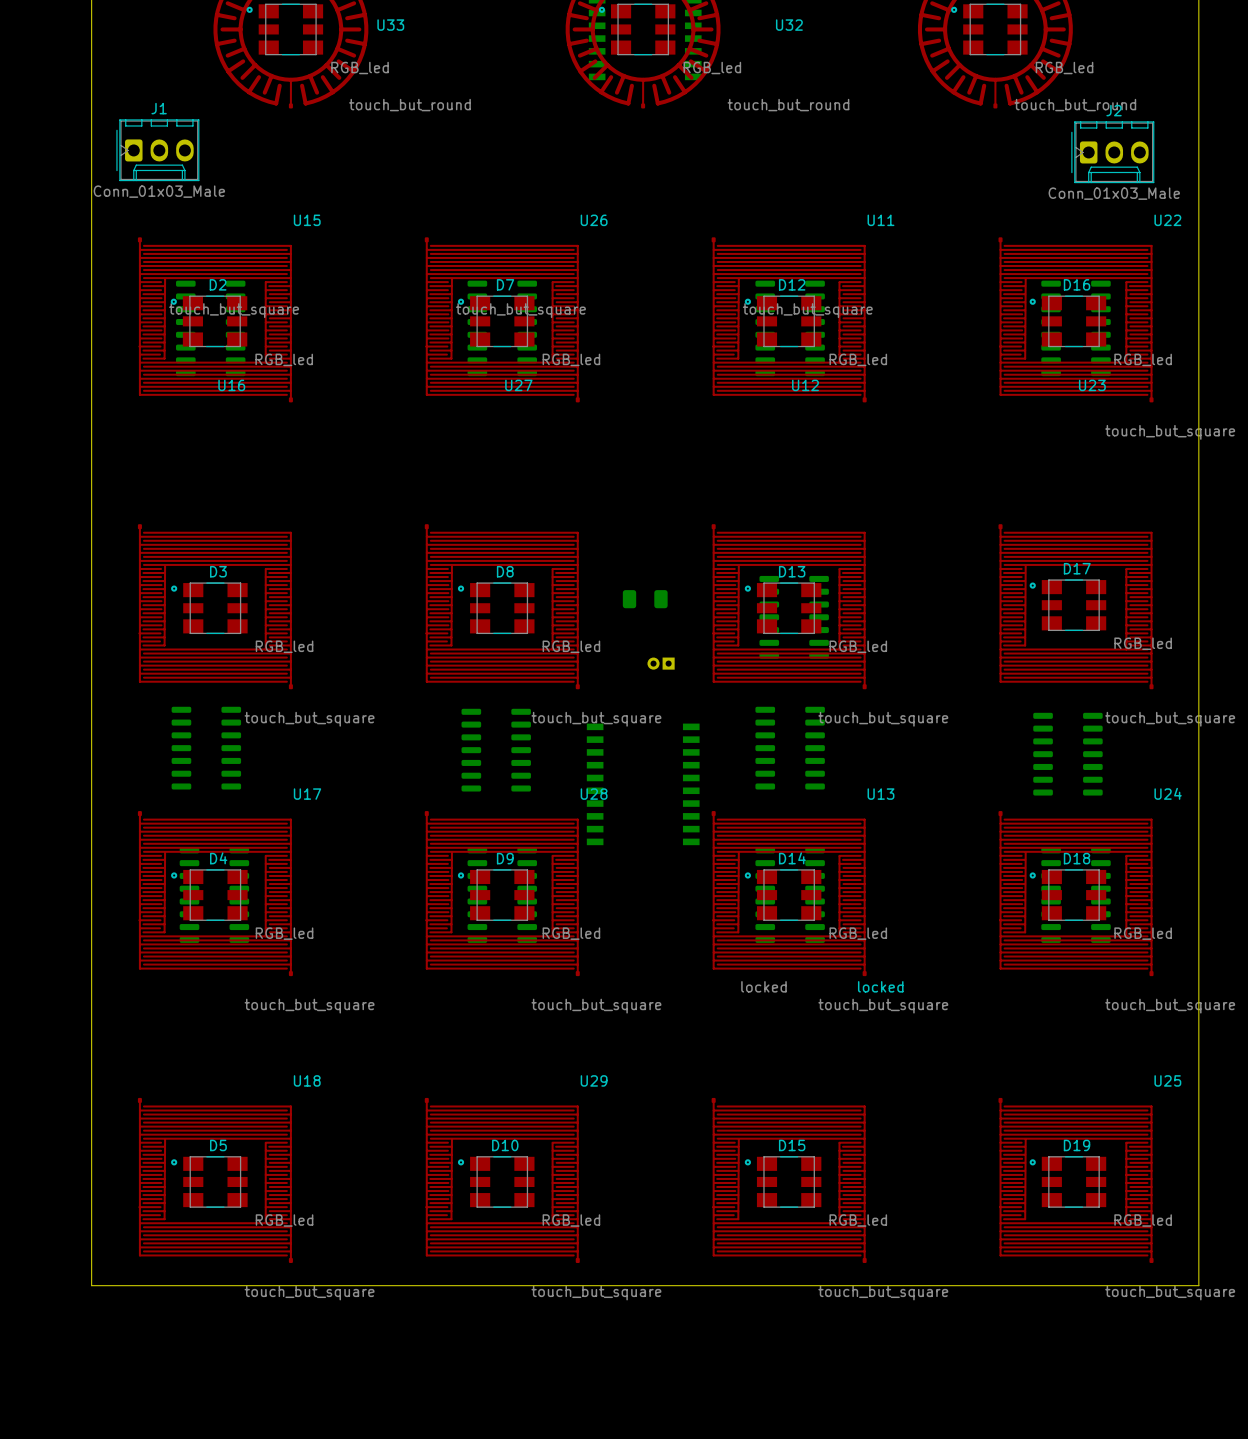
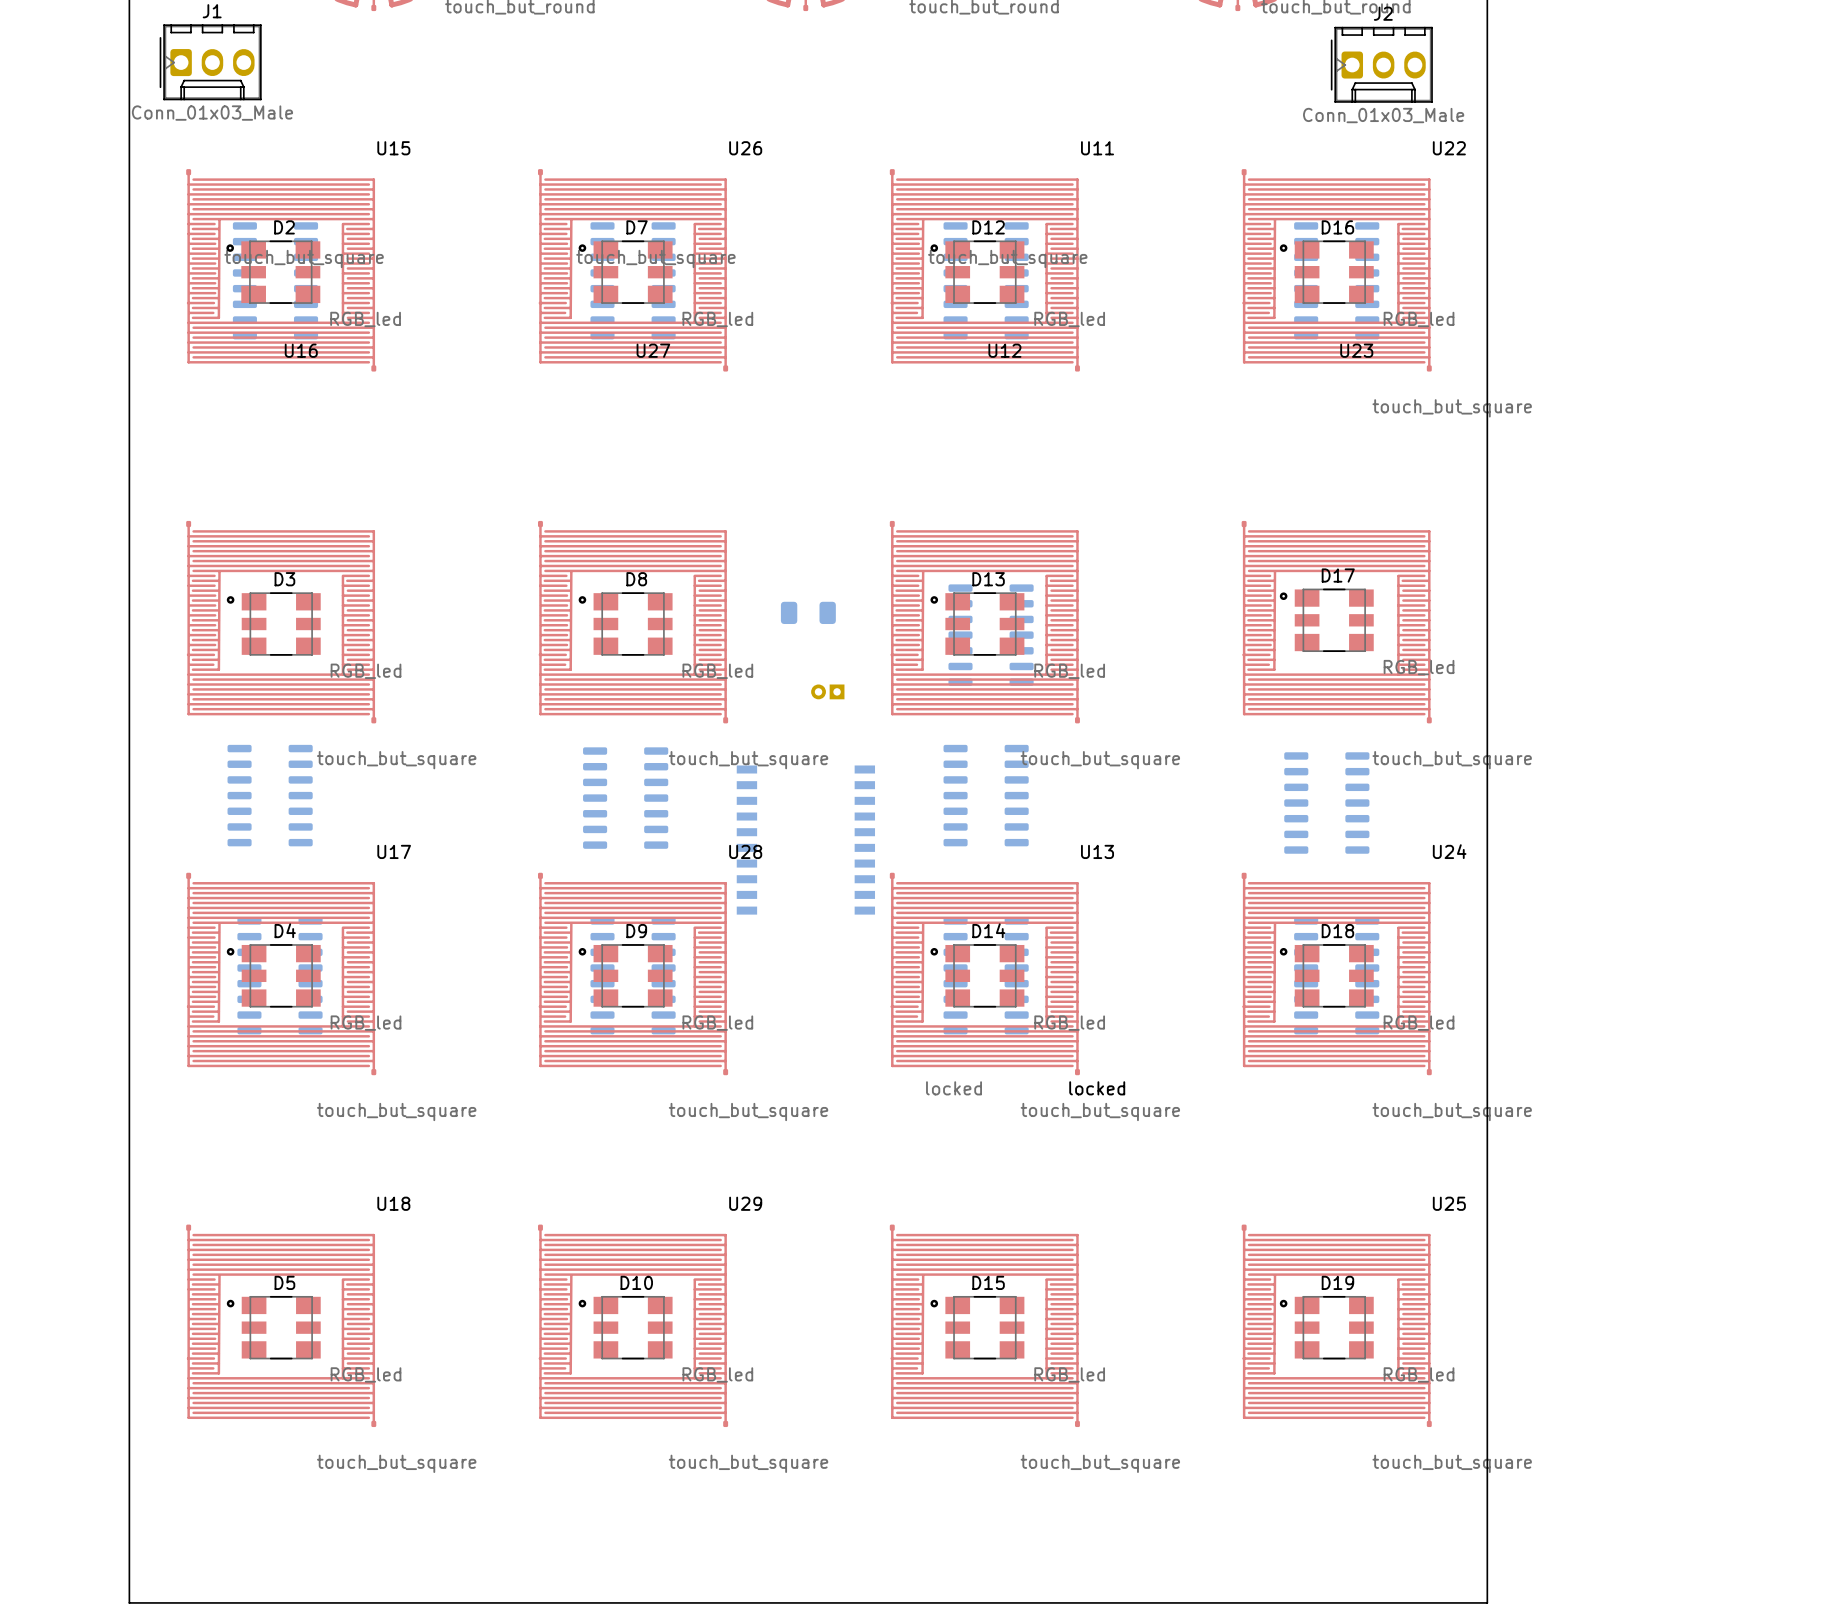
board edge: (91, 1285) (1198, 1285) -> (129, 1454) (129, 1602) (1487, 1602) (1487, 1454)

